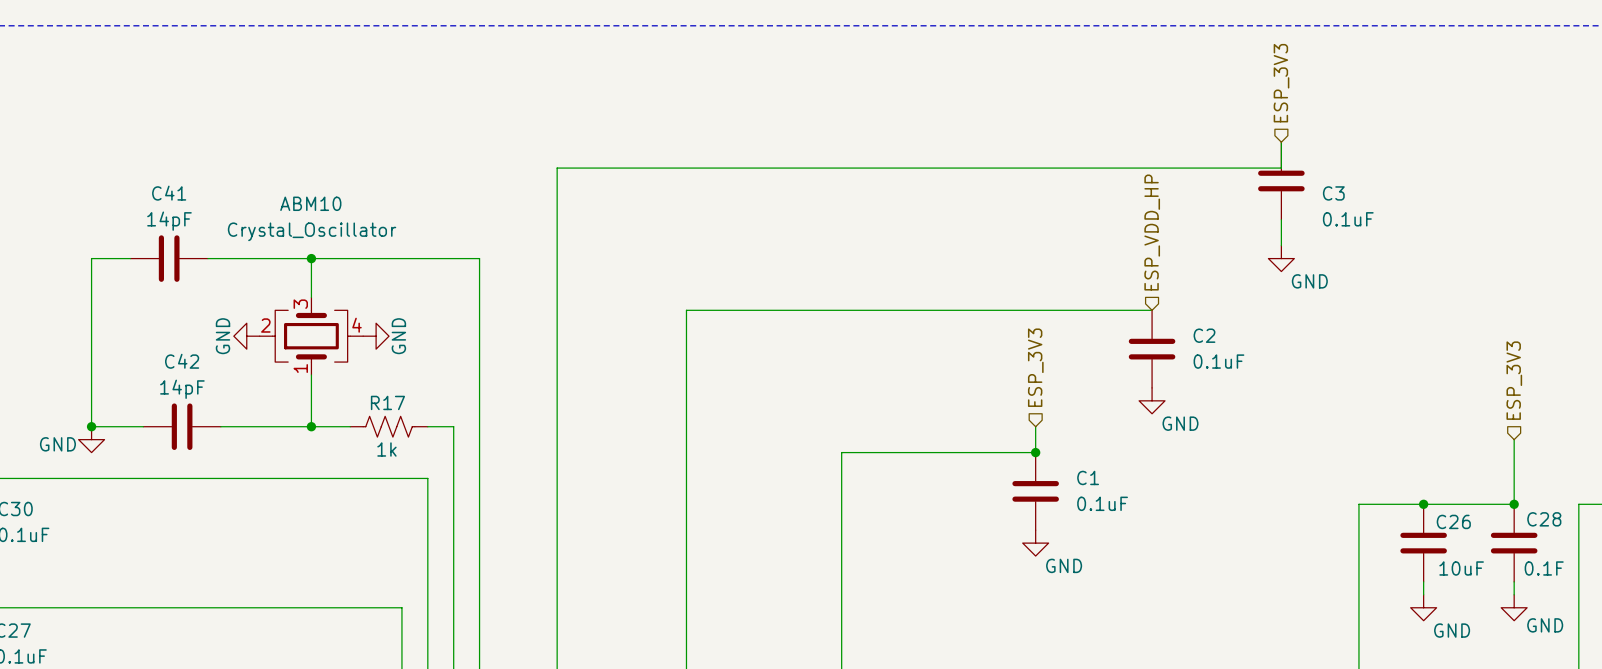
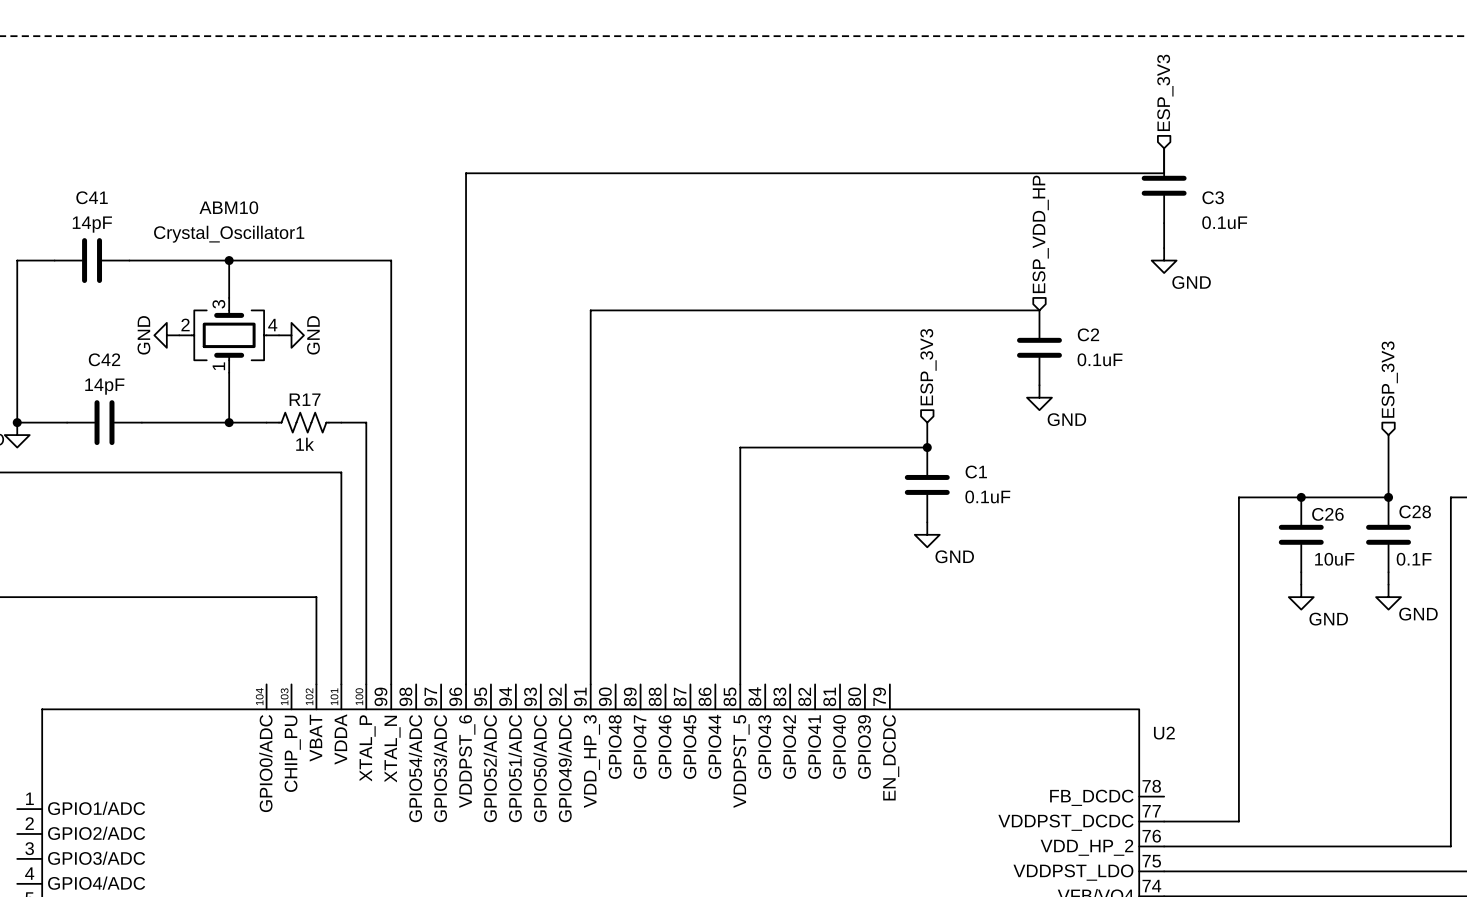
Crystal_Oscillator name: Crystal_Oscillator (312, 231) -> Crystal_Oscillator1 (229, 234)

